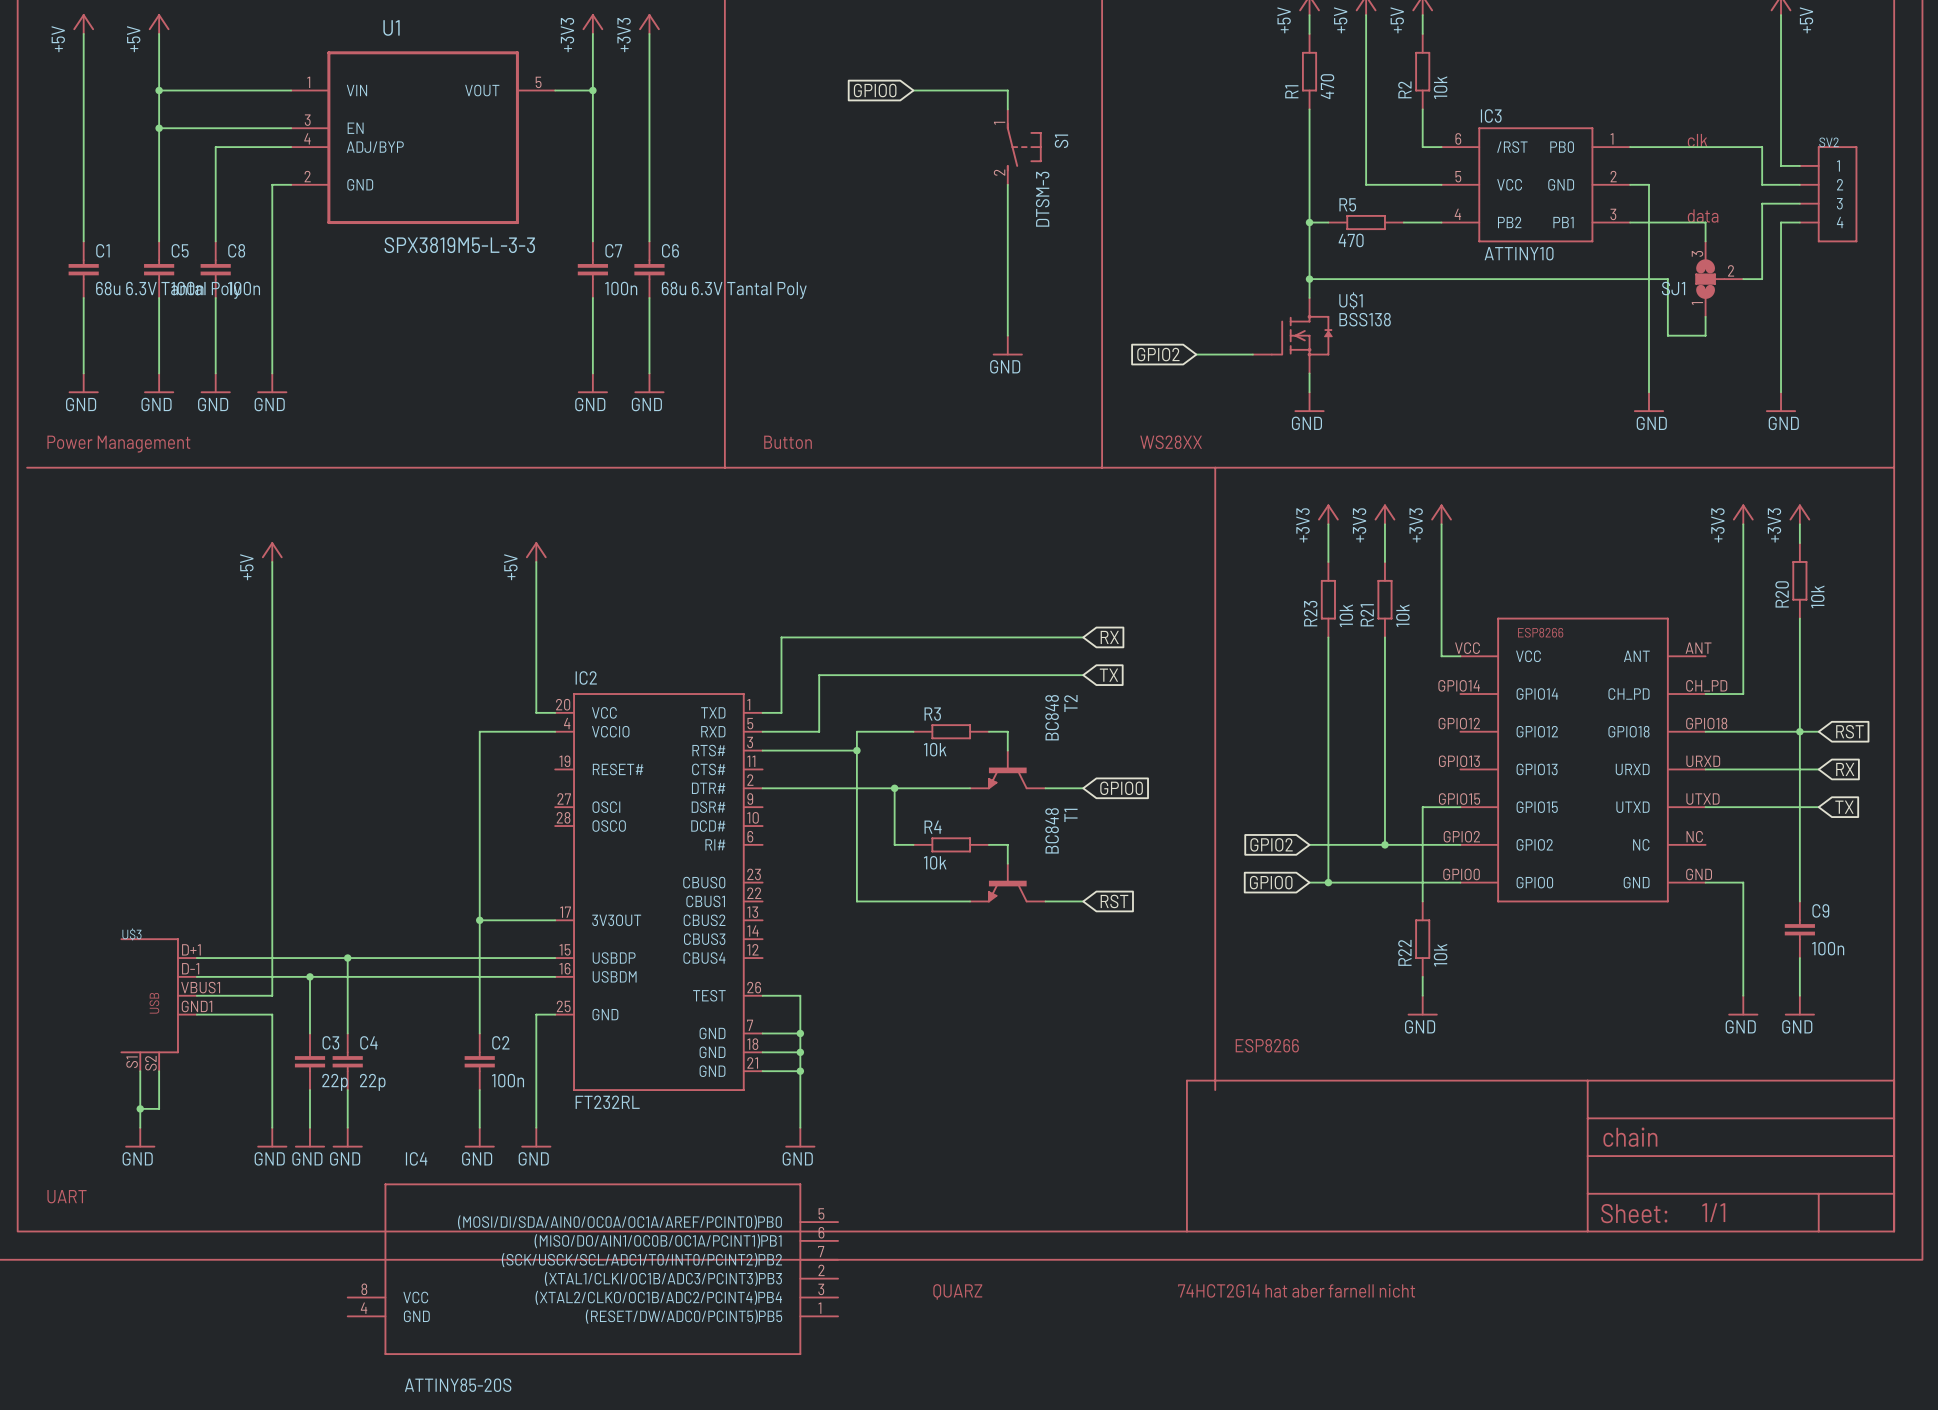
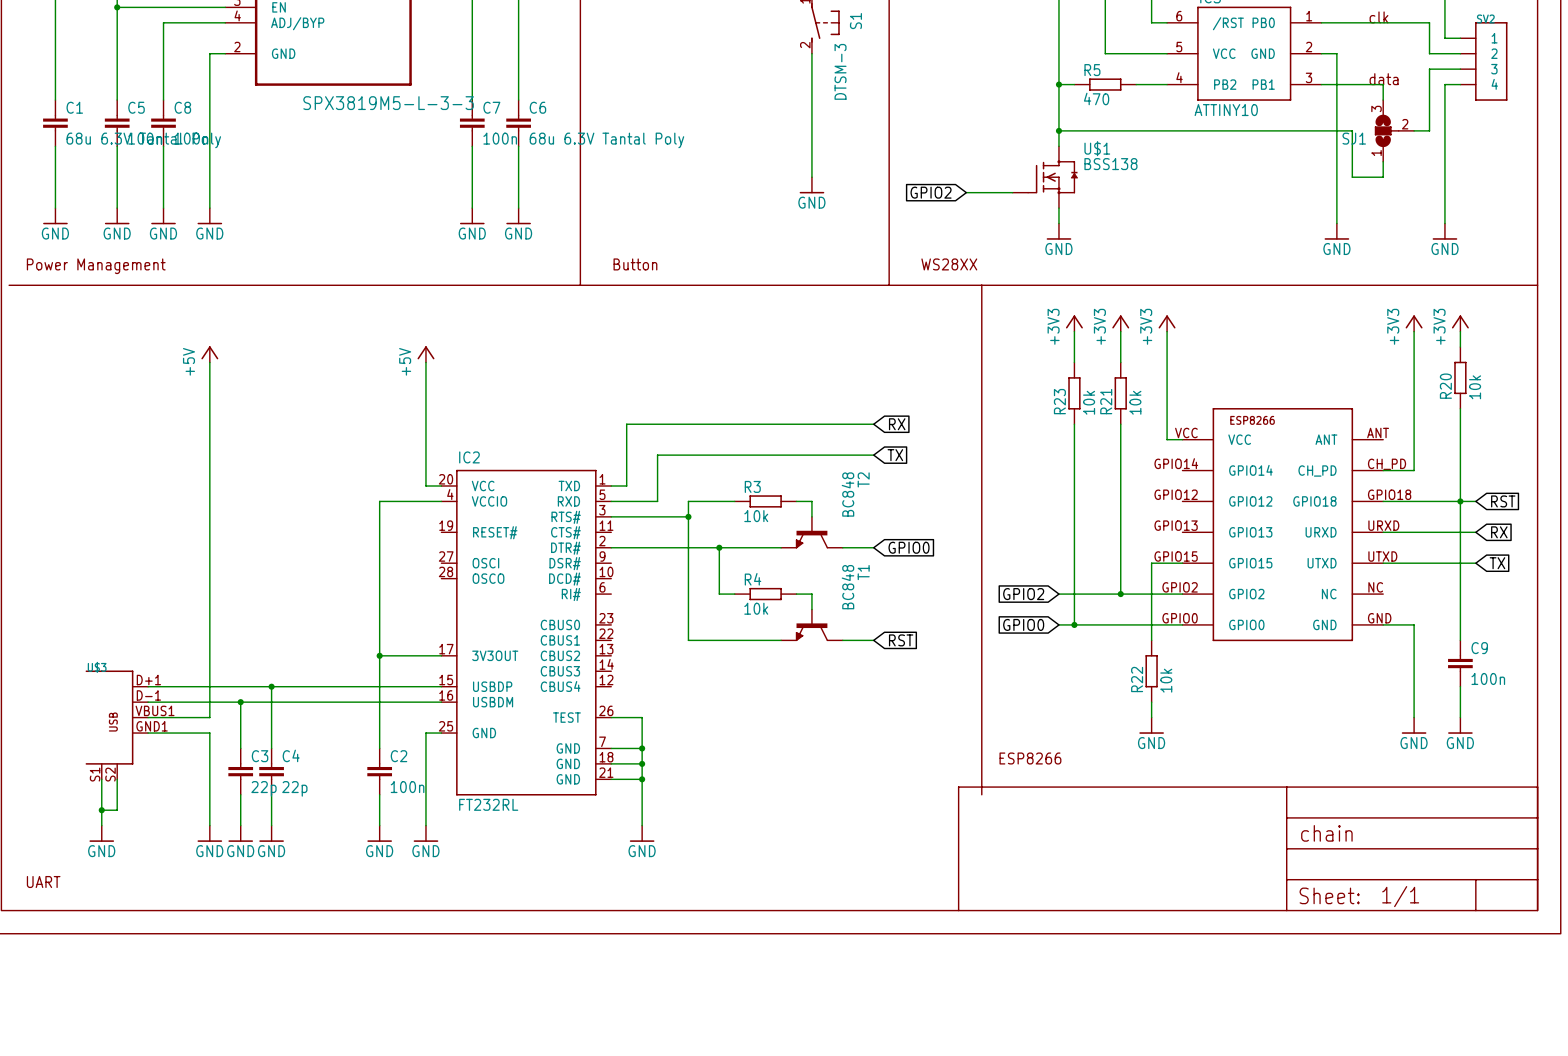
IC4: ATTINY85-20S (592, 1269) -> none
text: 74HCT2G14 hat aber farnell nicht (1296, 1290) -> none
text: QUARZ (957, 1291) -> none

